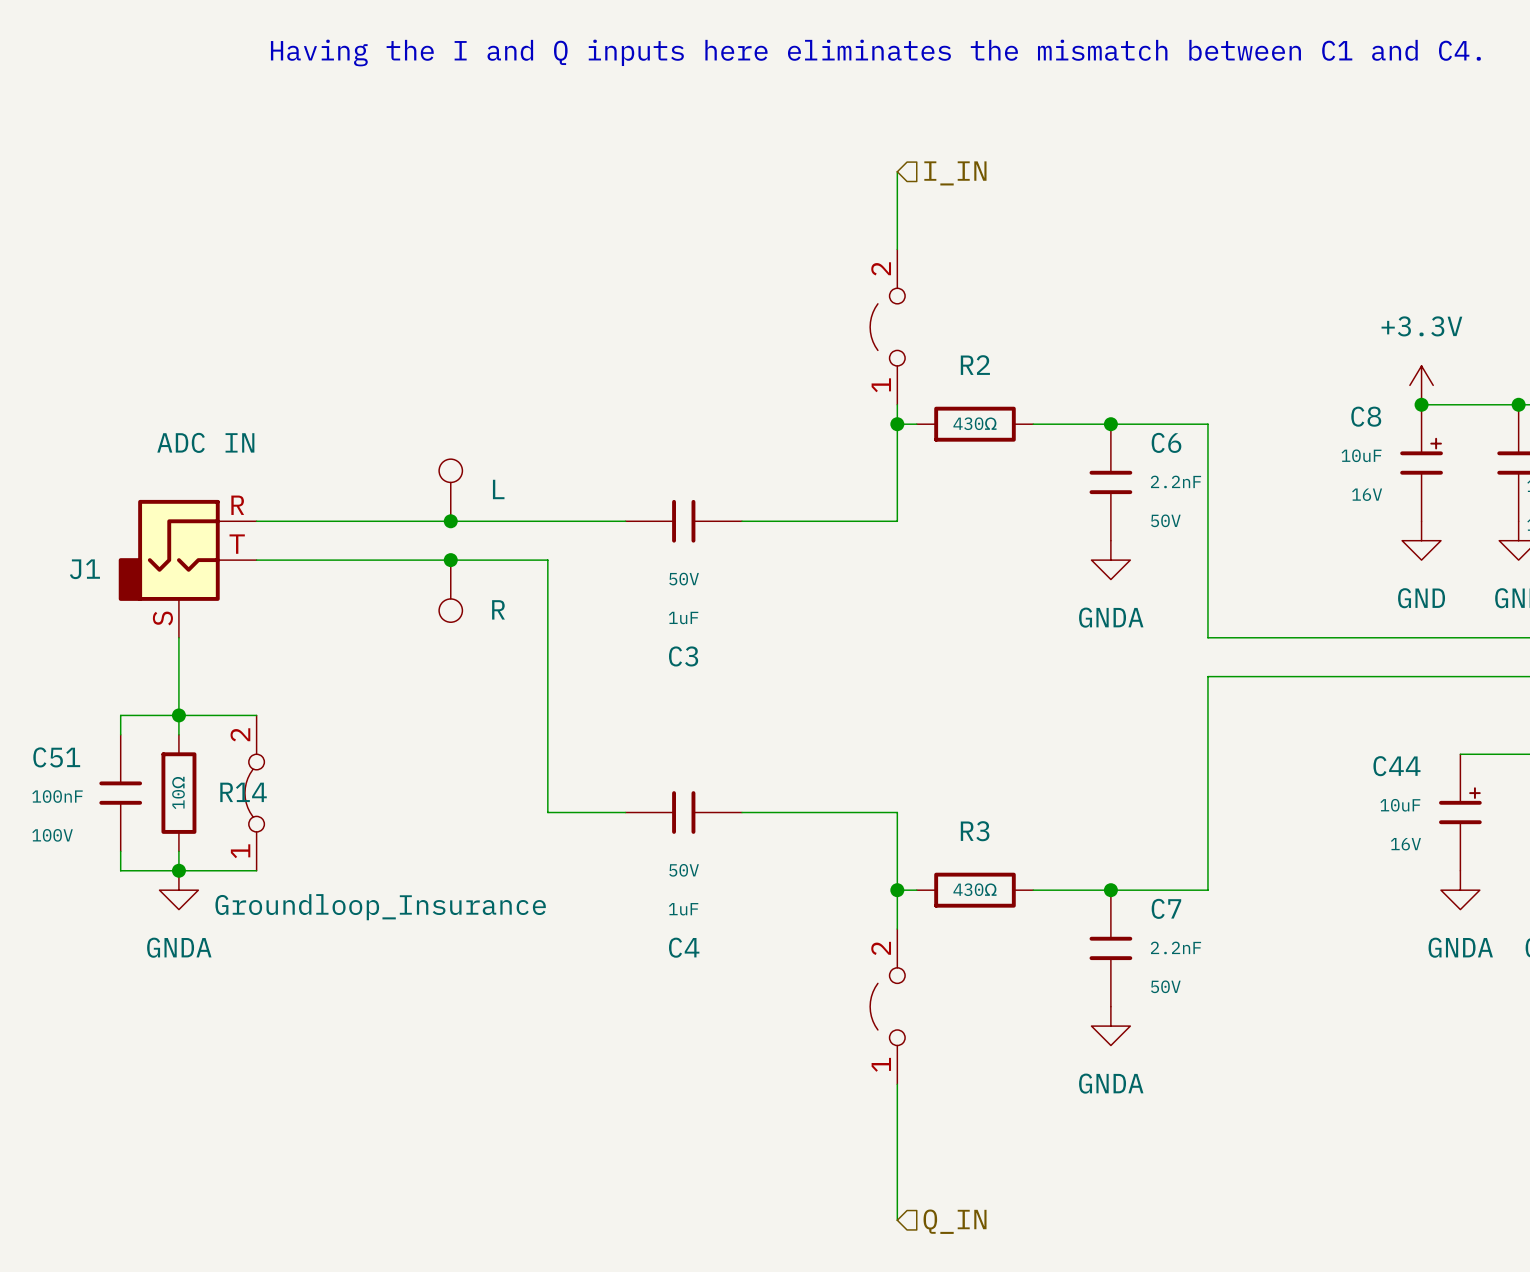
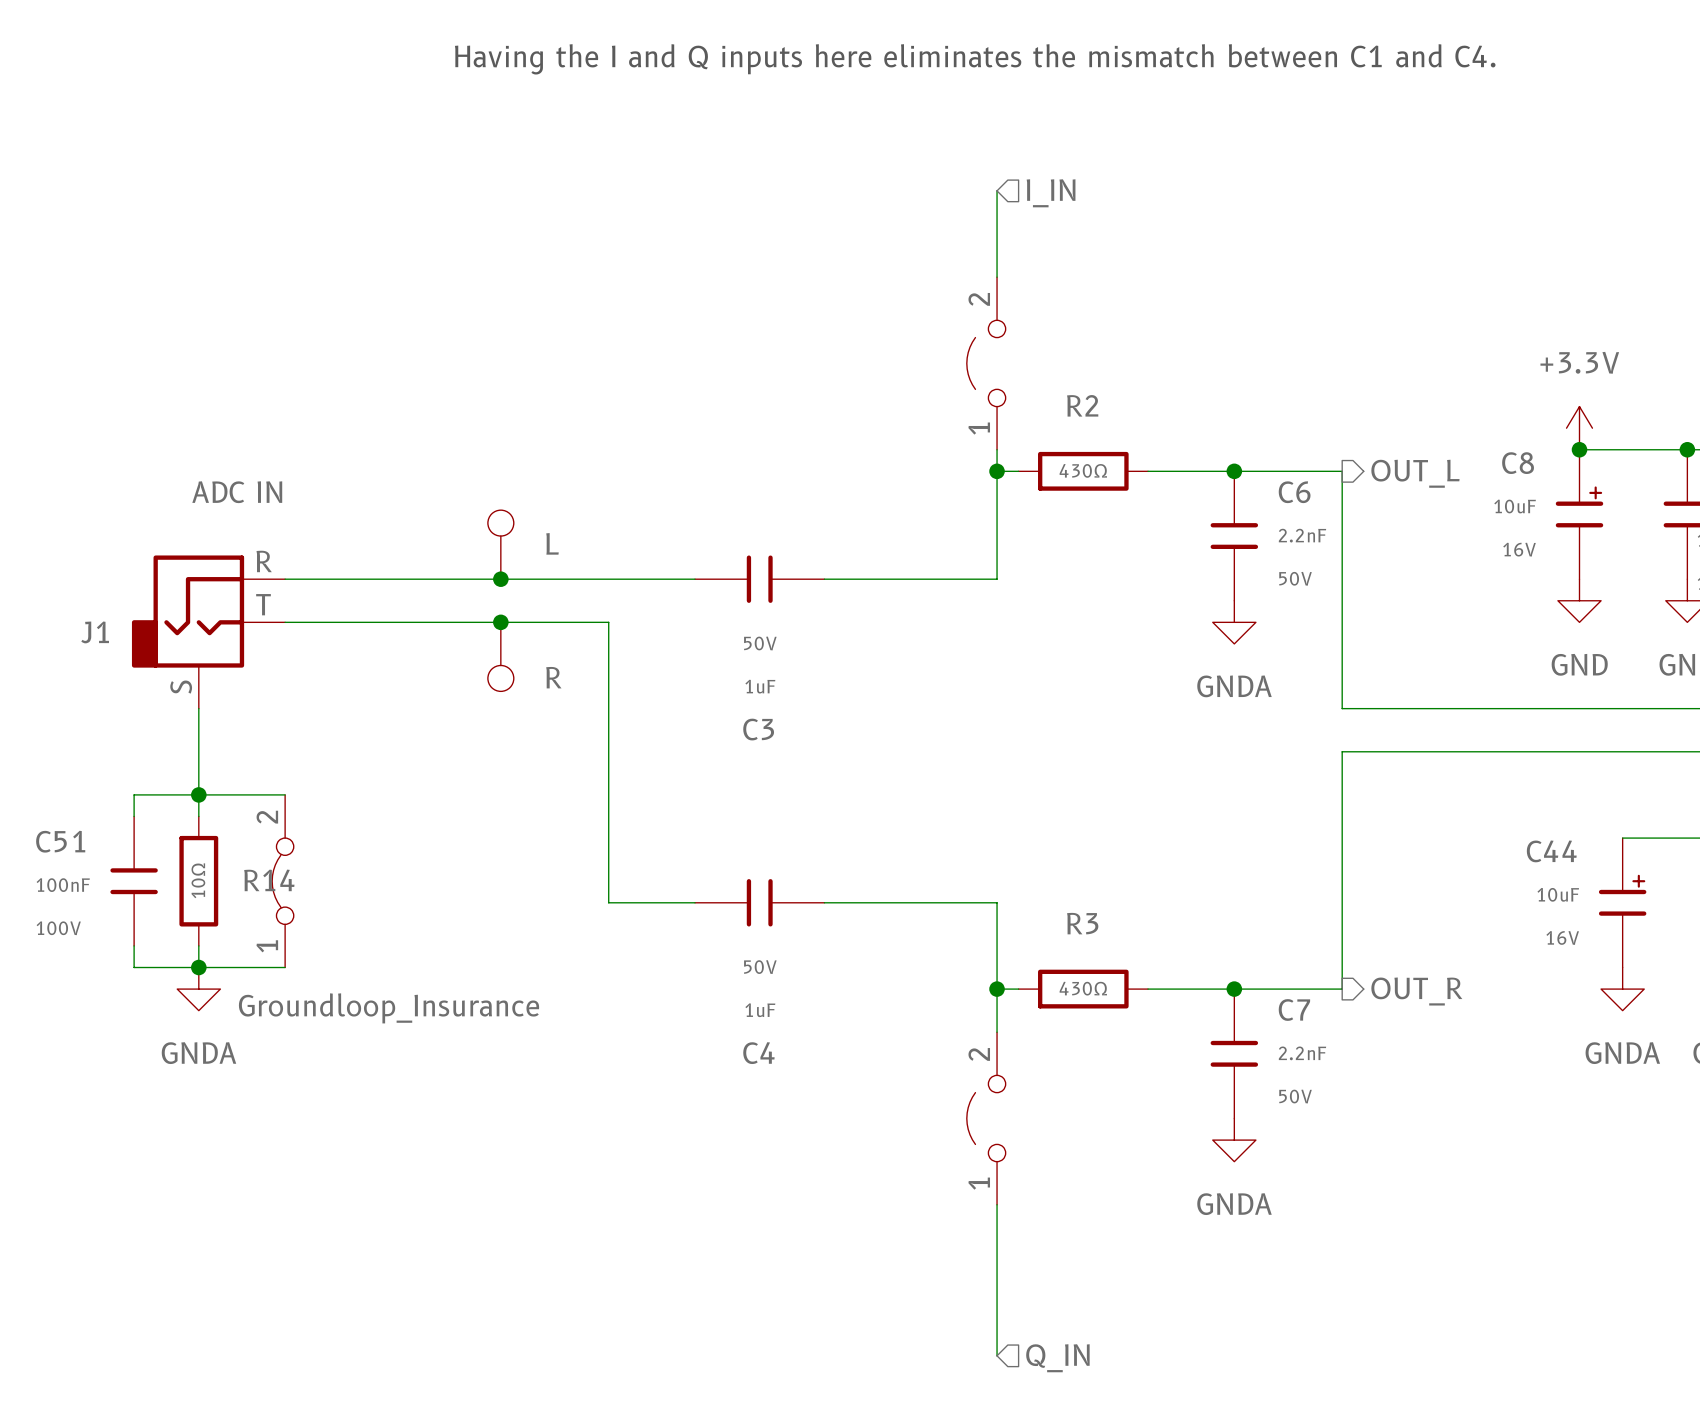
hierarchical label: none -> OUT_L (1415, 473)
hierarchical label: none -> OUT_R (1416, 991)

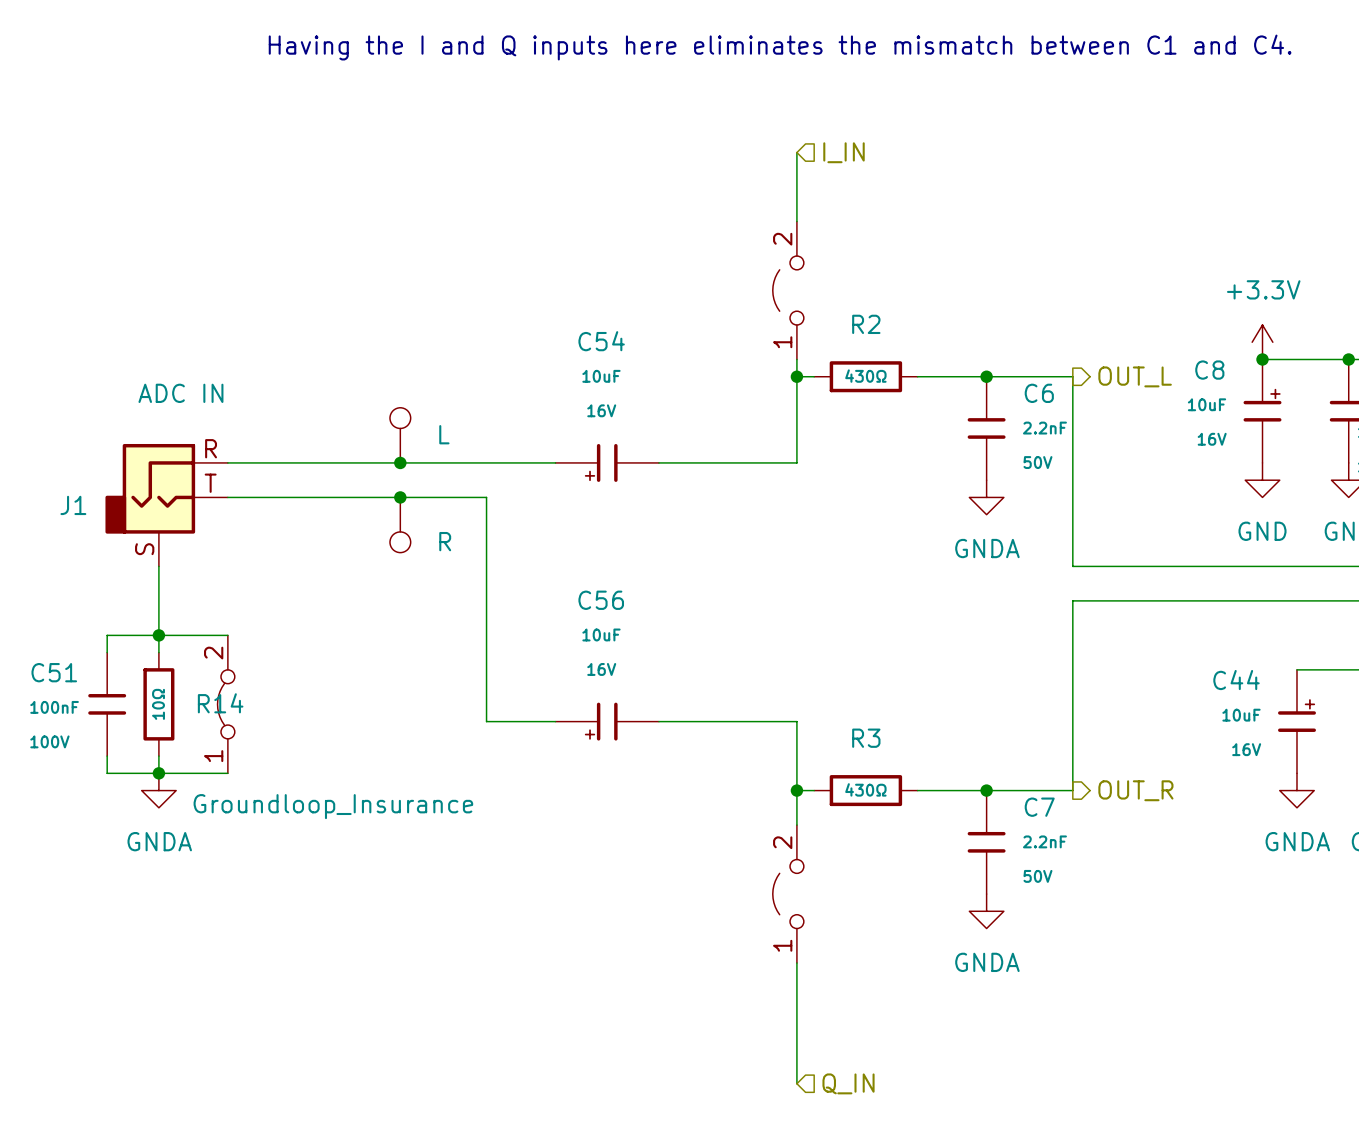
C3: 1uF (759, 579) -> none
C54: none -> 10uF (607, 462)
C4: 1uF (759, 902) -> none
C56: none -> 10uF (607, 721)

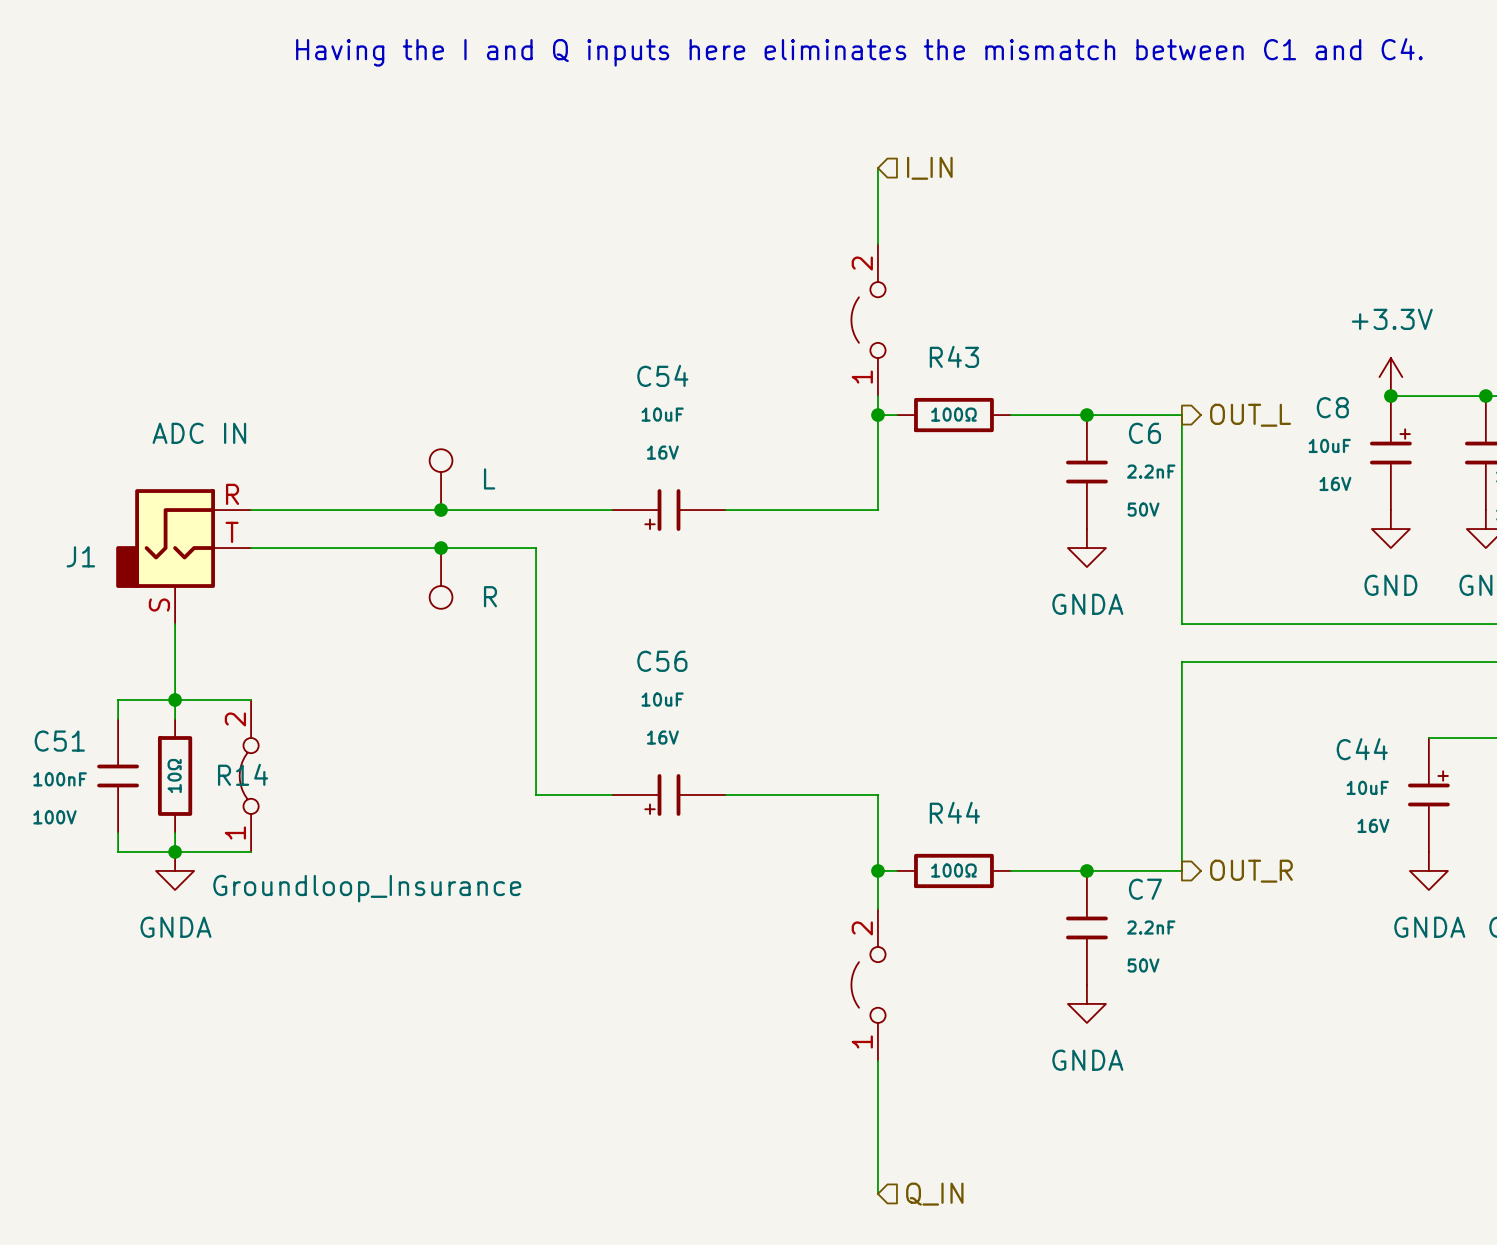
R2 name: R2 (866, 324) -> R43 (954, 356)
R2 value: 430Ω (865, 376) -> 100Ω (953, 414)
R3 name: R3 (866, 738) -> R44 (954, 812)
R3 value: 430Ω (865, 789) -> 100Ω (953, 870)

